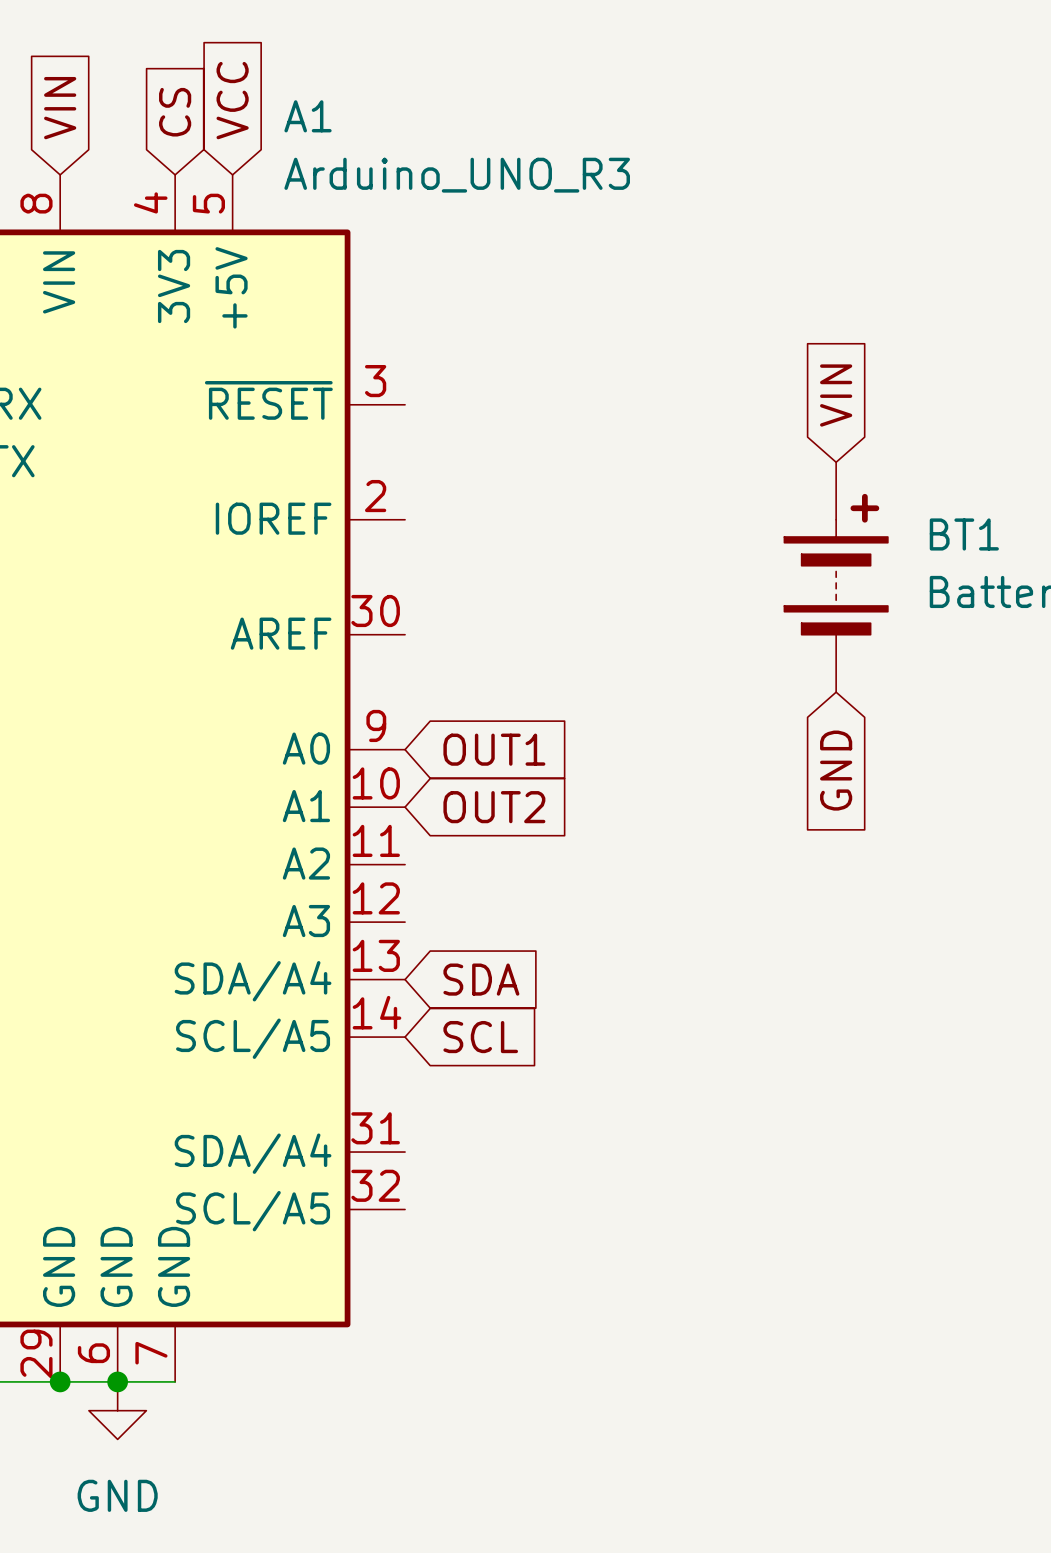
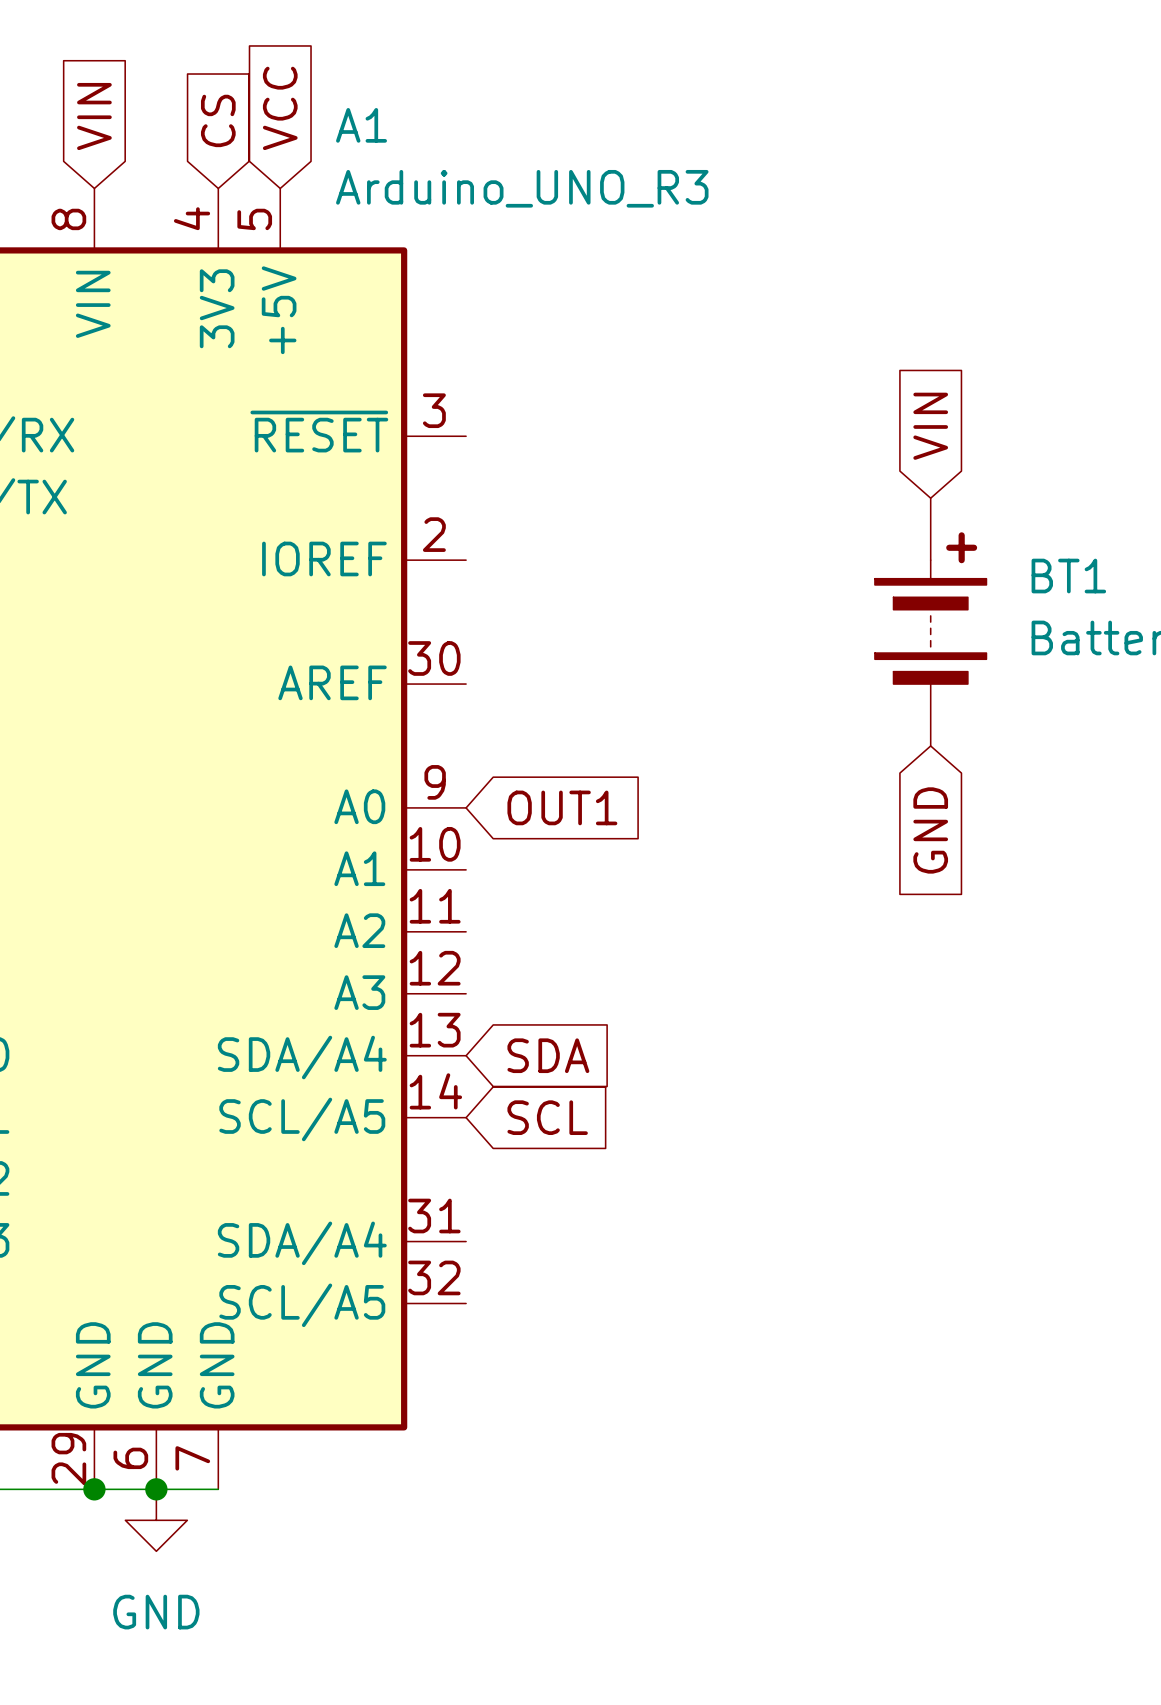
global label: OUT2 (494, 807) -> none

